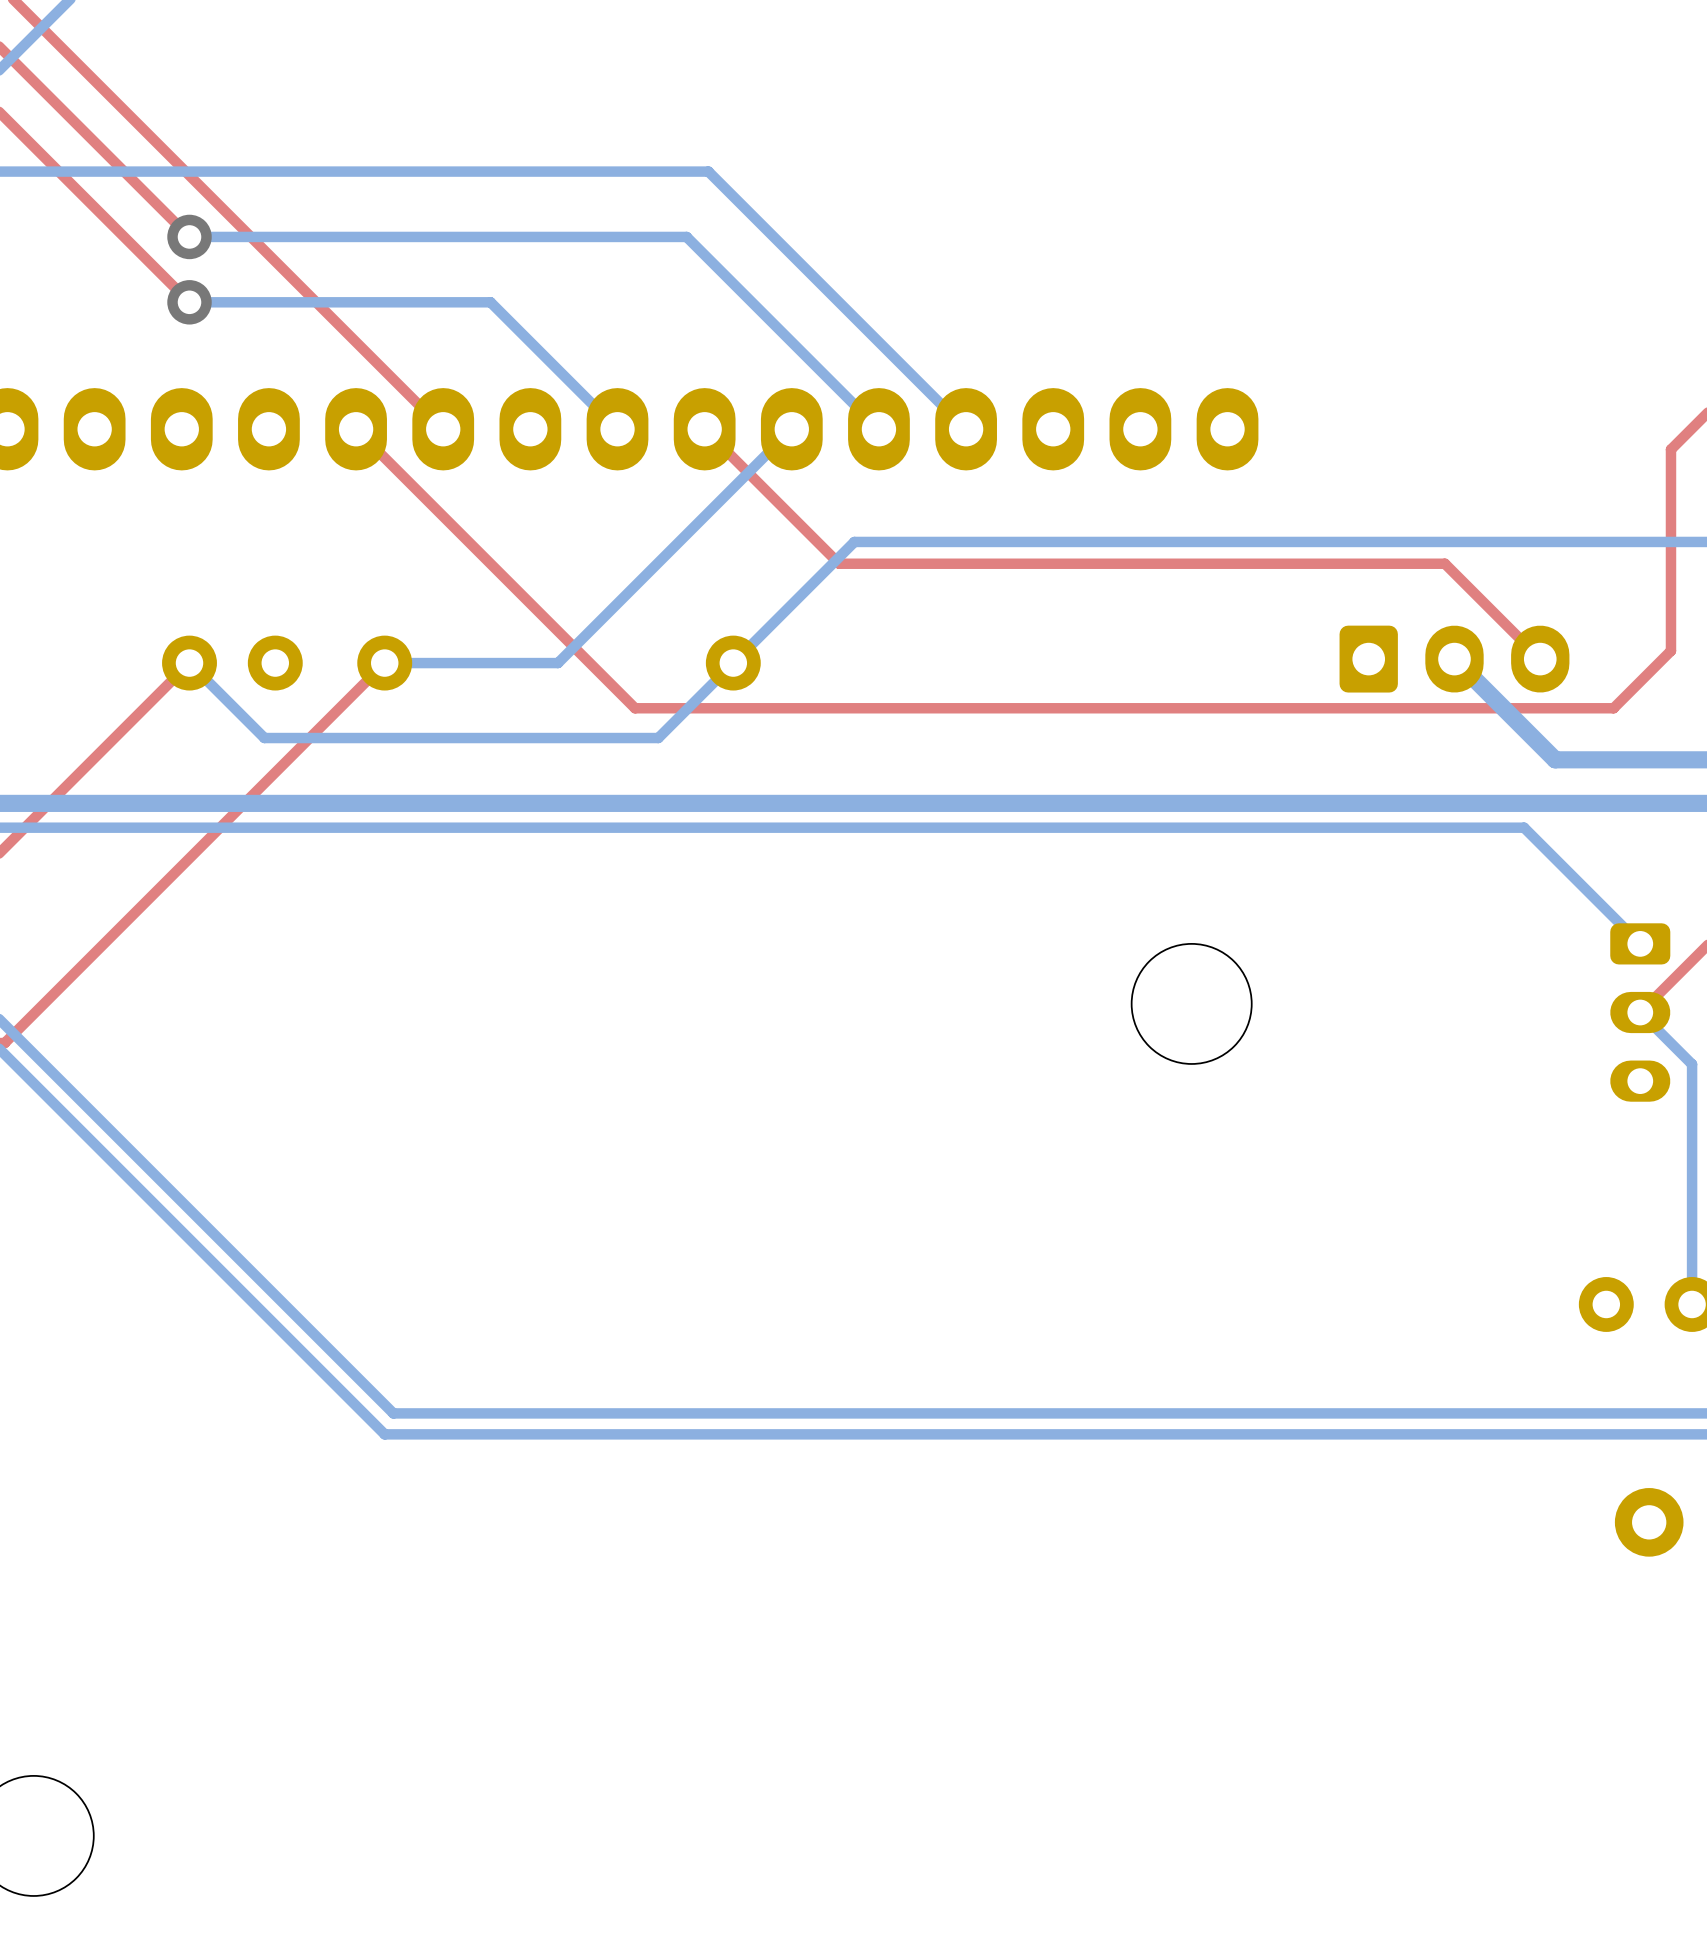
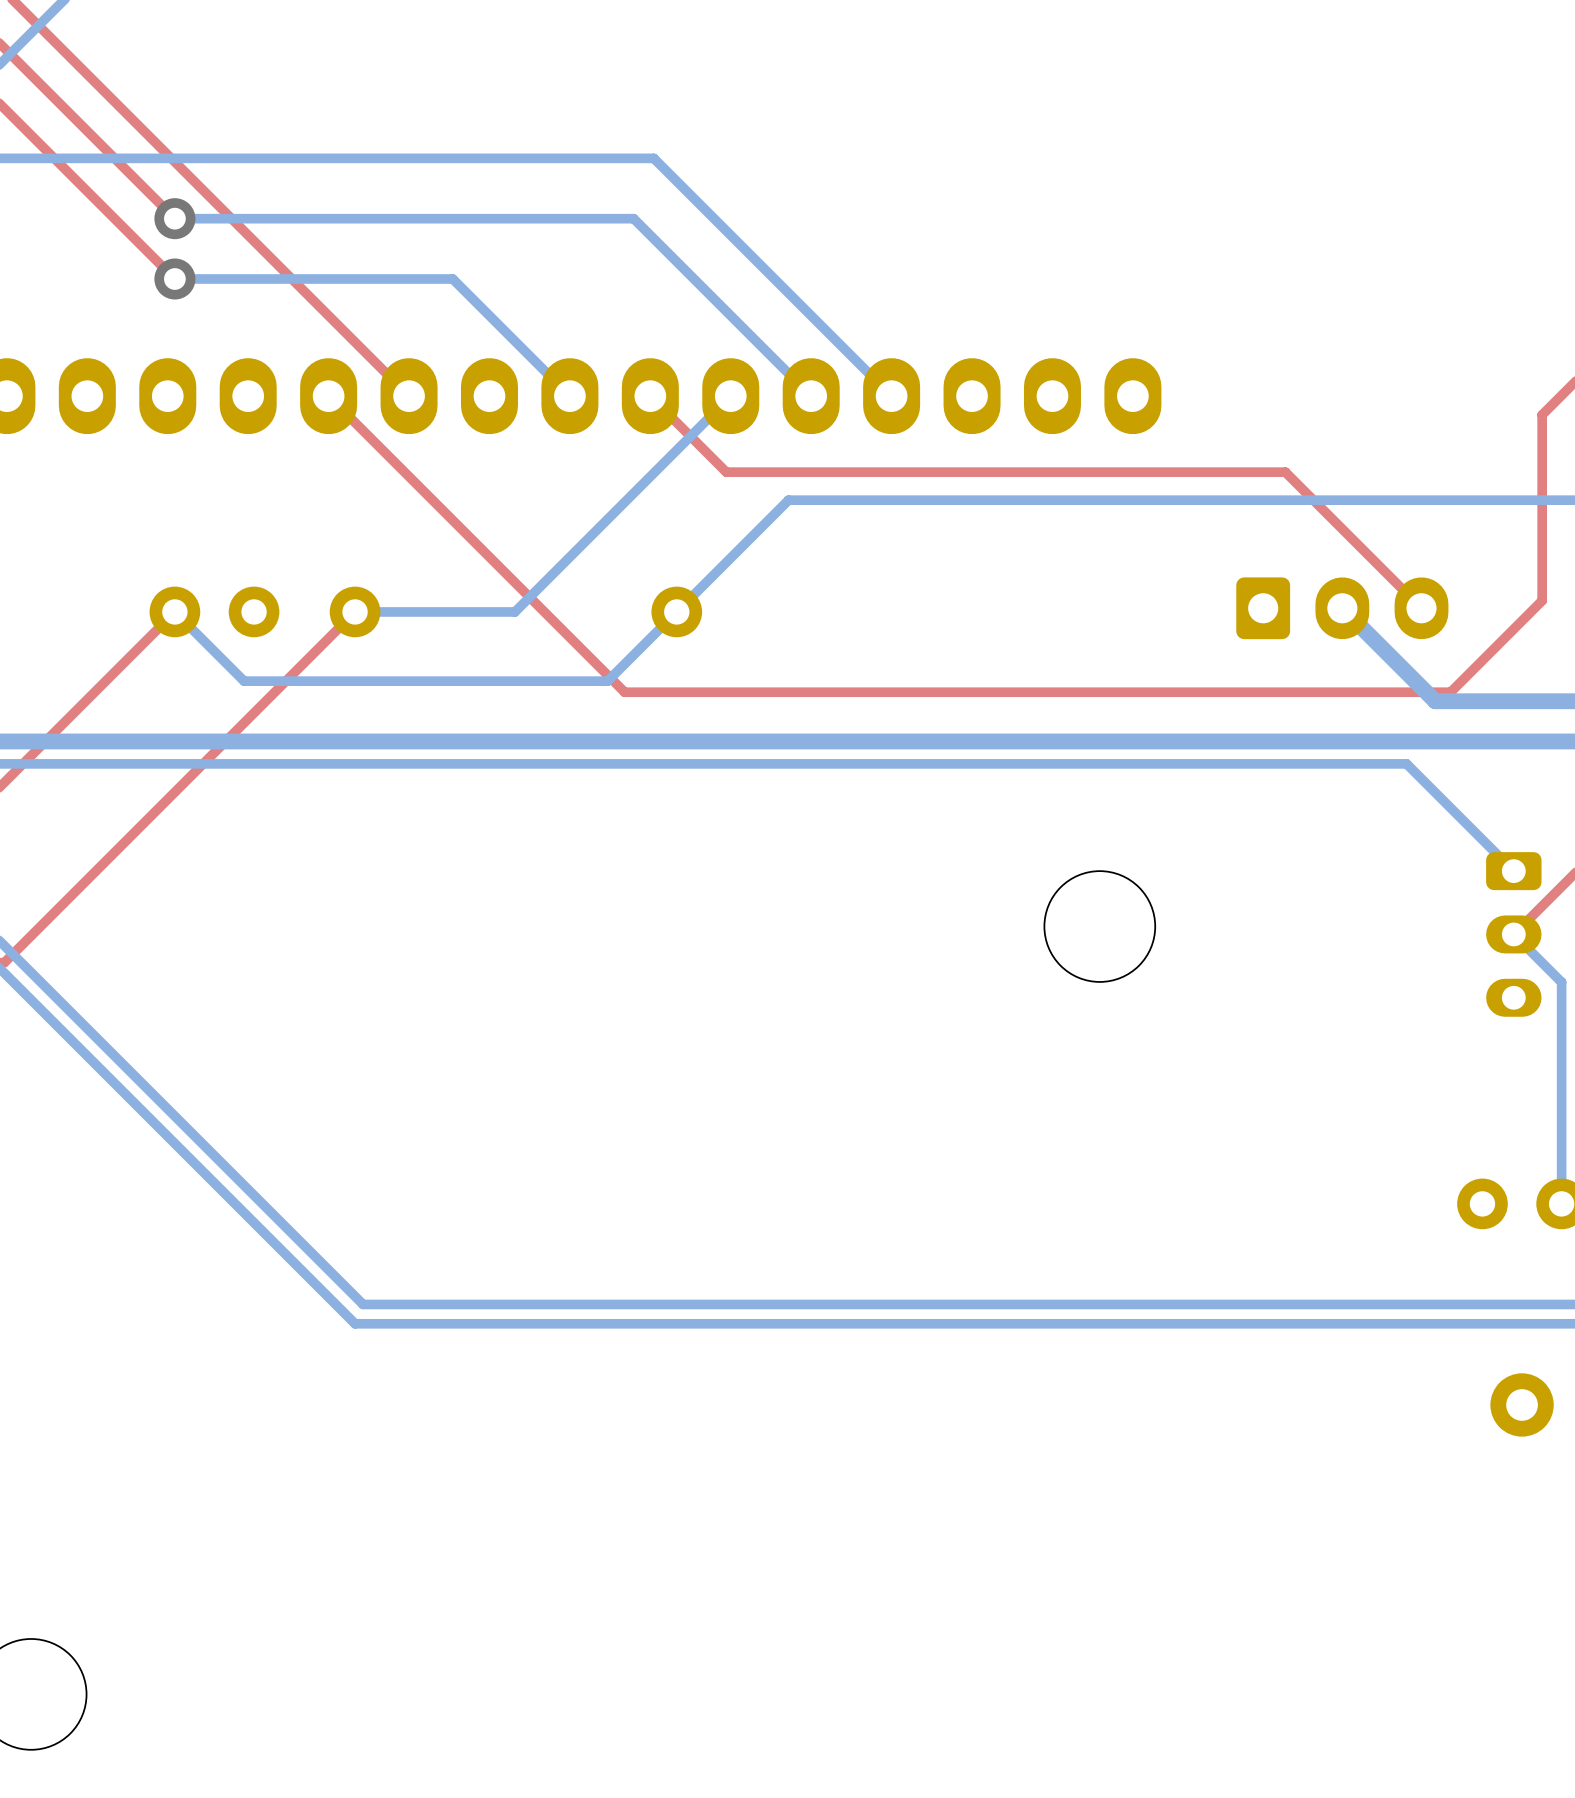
top track: (787, 511) (839, 563) (1444, 563) -> (726, 472) (1285, 472) (1333, 520)
top track: (1613, 708) (635, 708) -> (1489, 653) (1450, 692) (624, 692) (586, 653)

